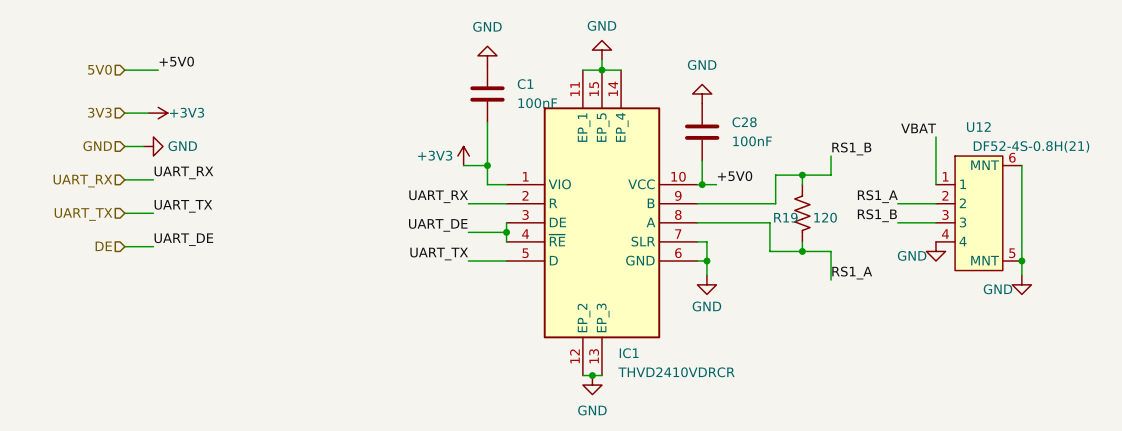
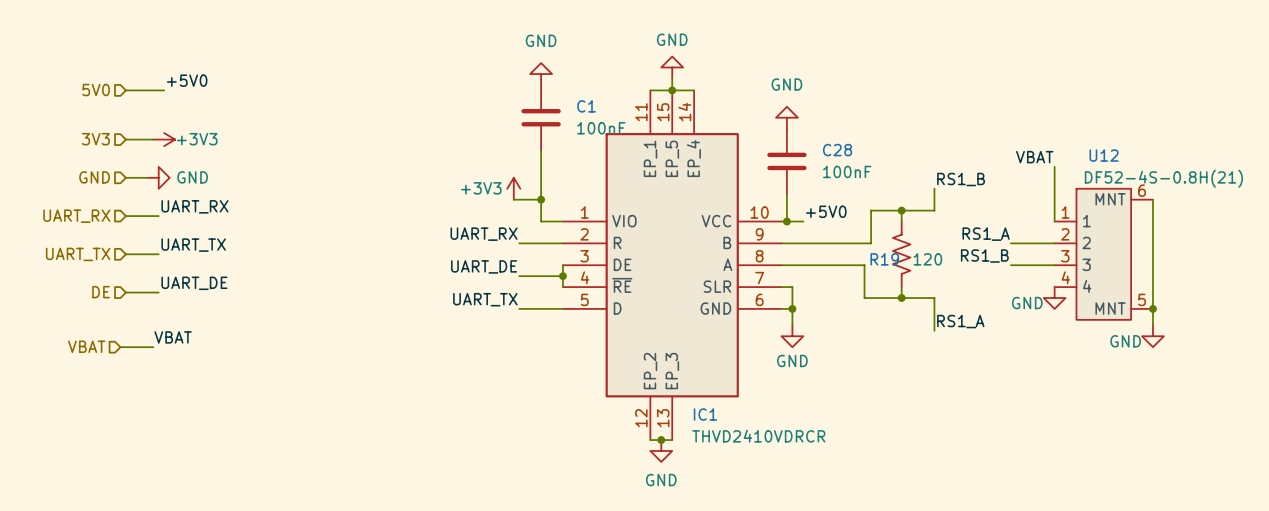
label: none -> VBAT (173, 337)
hierarchical label: none -> VBAT (86, 346)
wire: none -> (120, 347) (153, 347)

